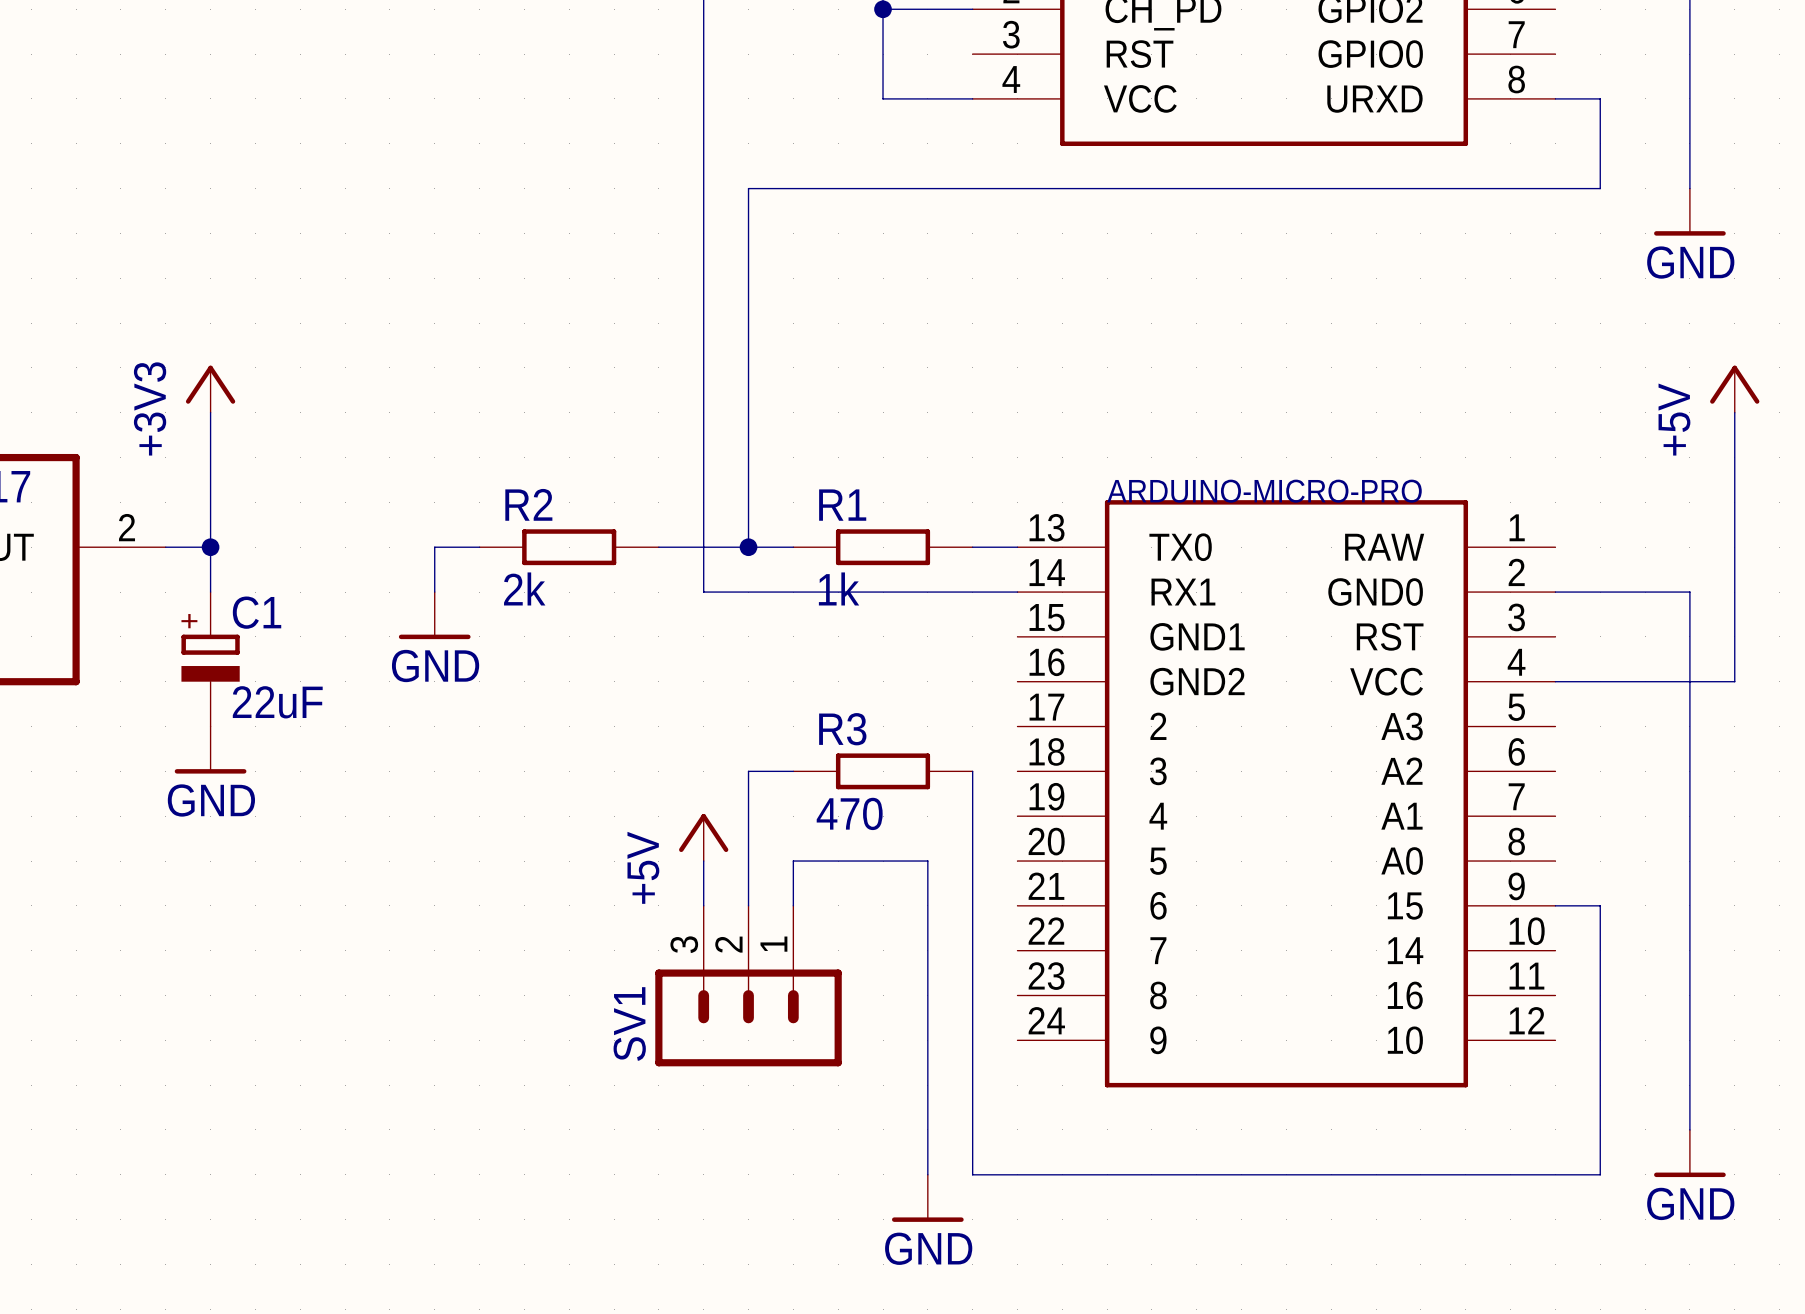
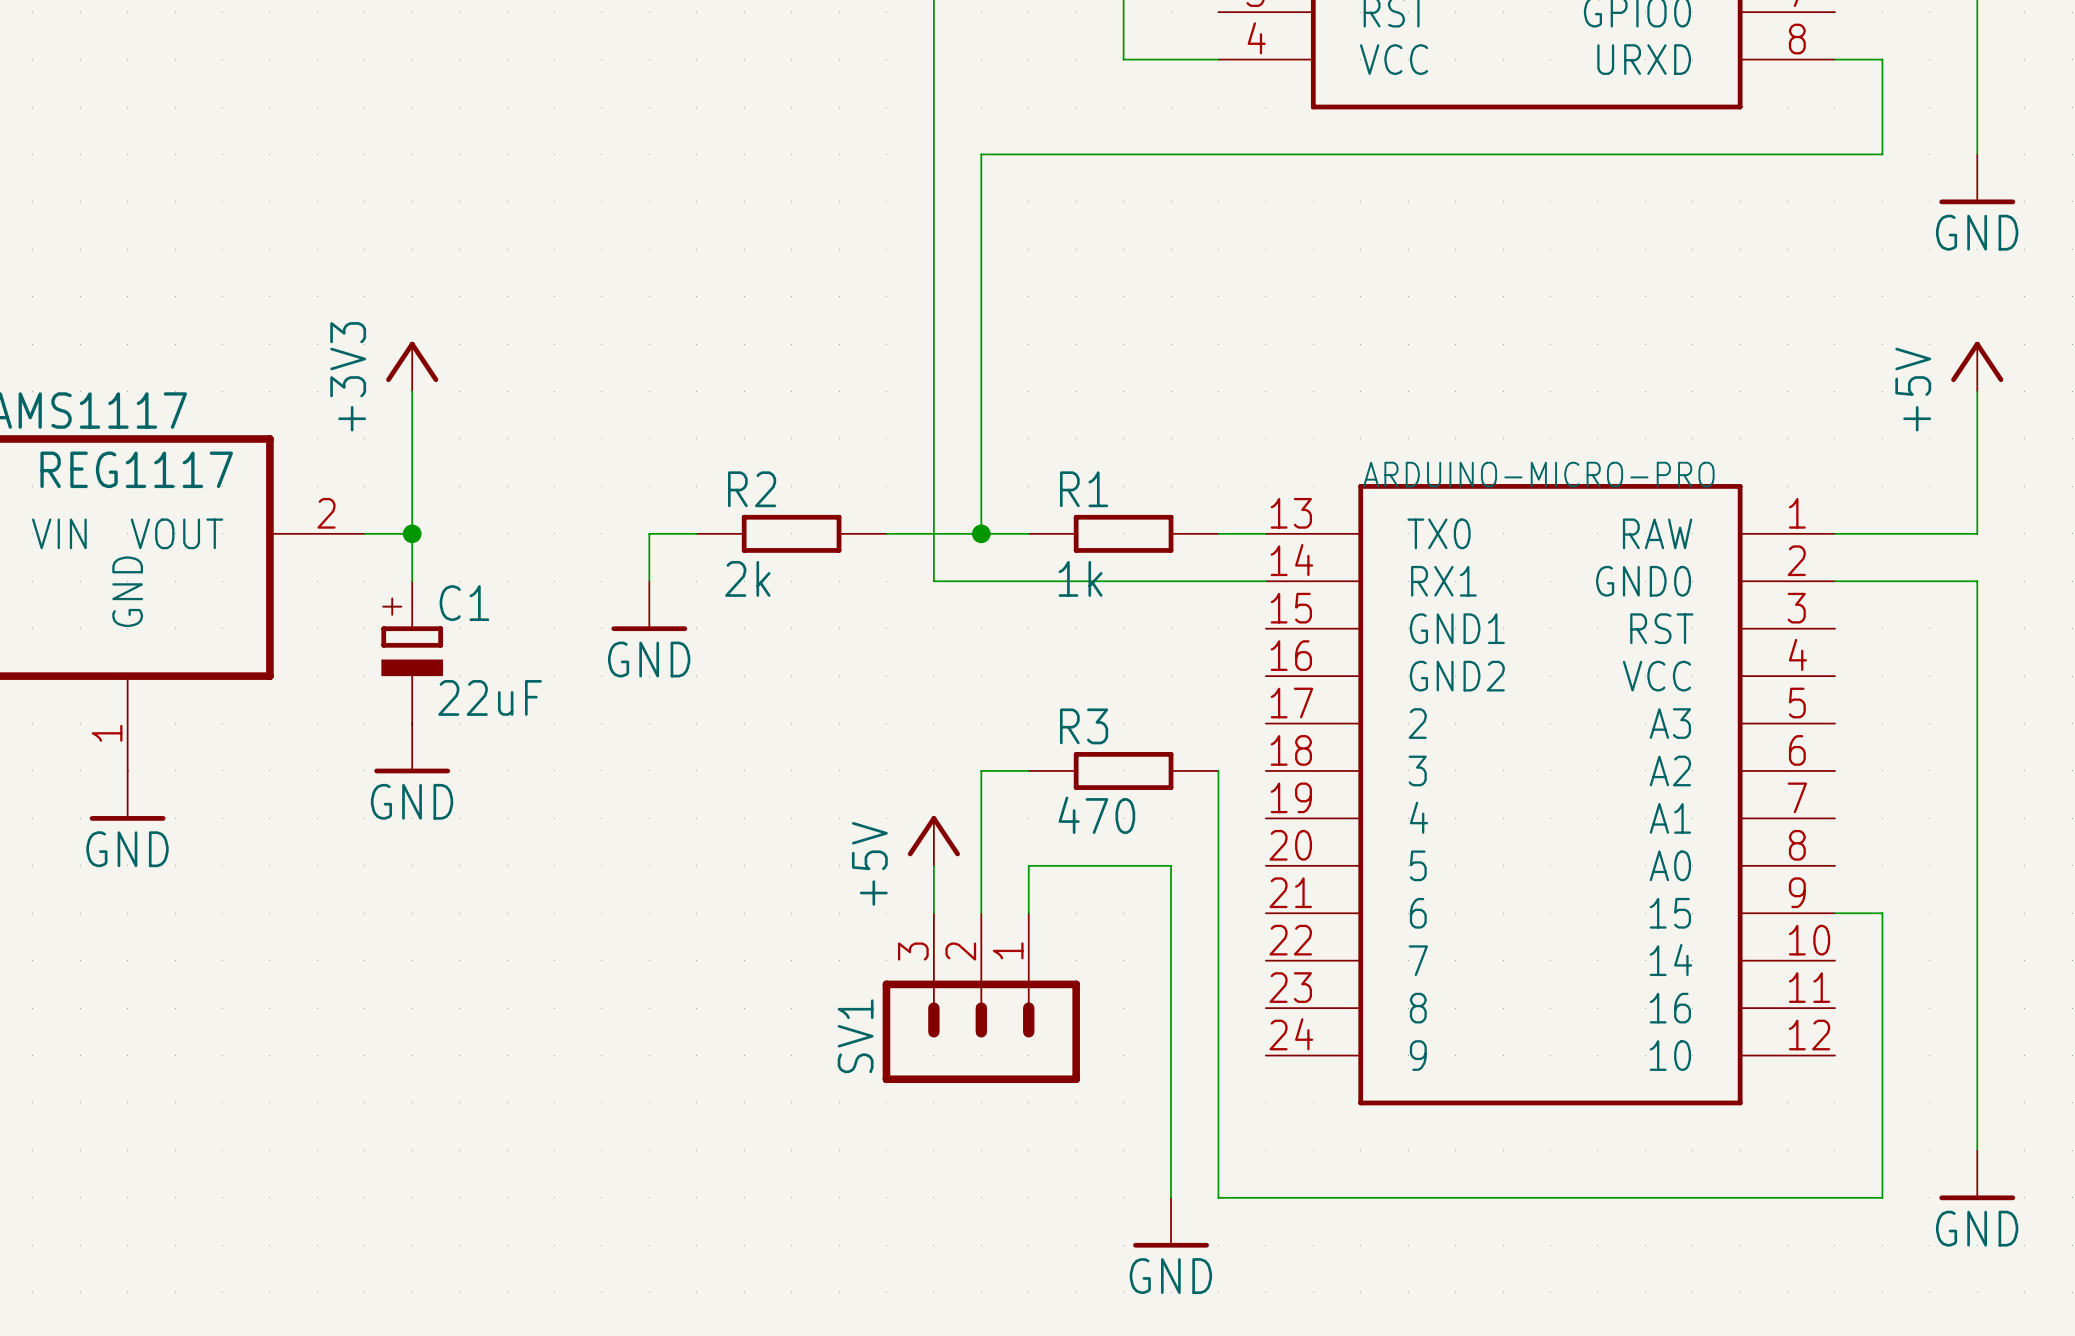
power symbol position: +5V (1734, 389) -> +5V (1977, 366)
wire: none -> (1977, 391) (1977, 533) (1834, 533)
wire: (1734, 412) (1734, 681) (1555, 681) -> none

